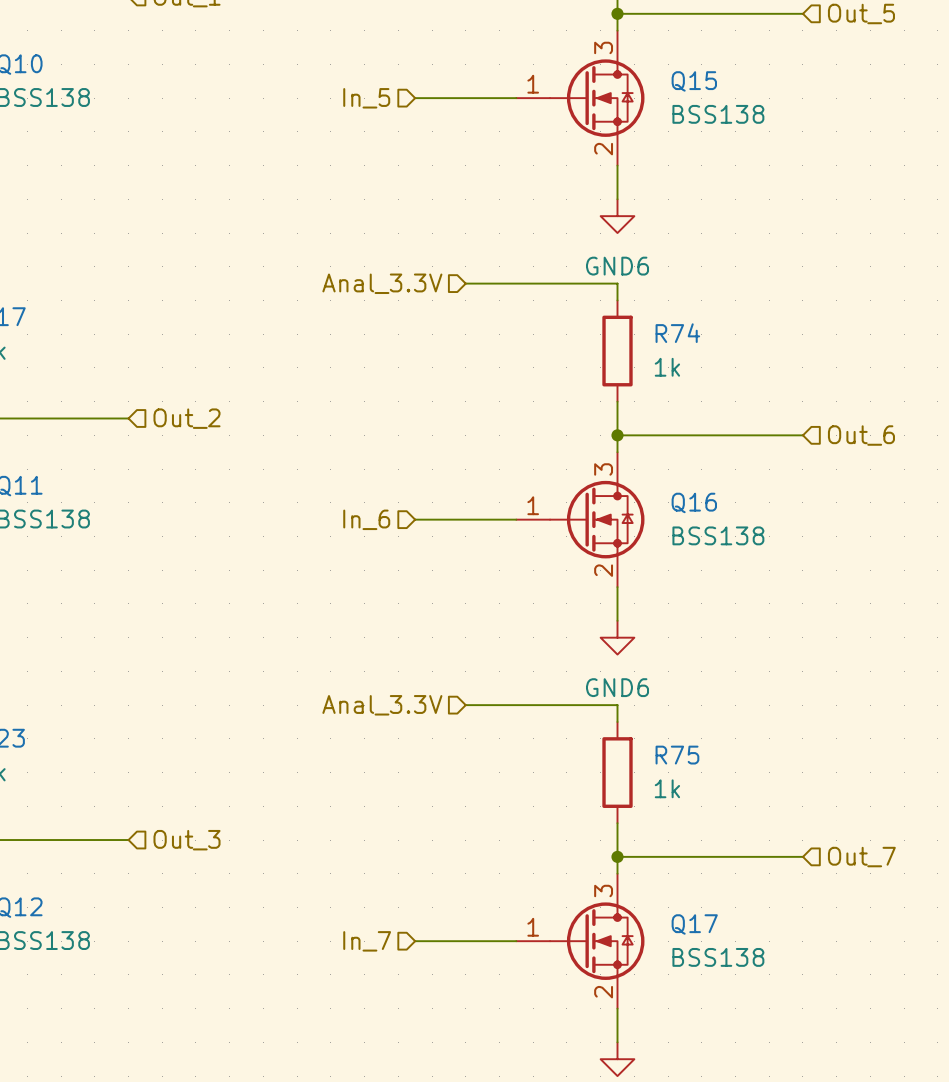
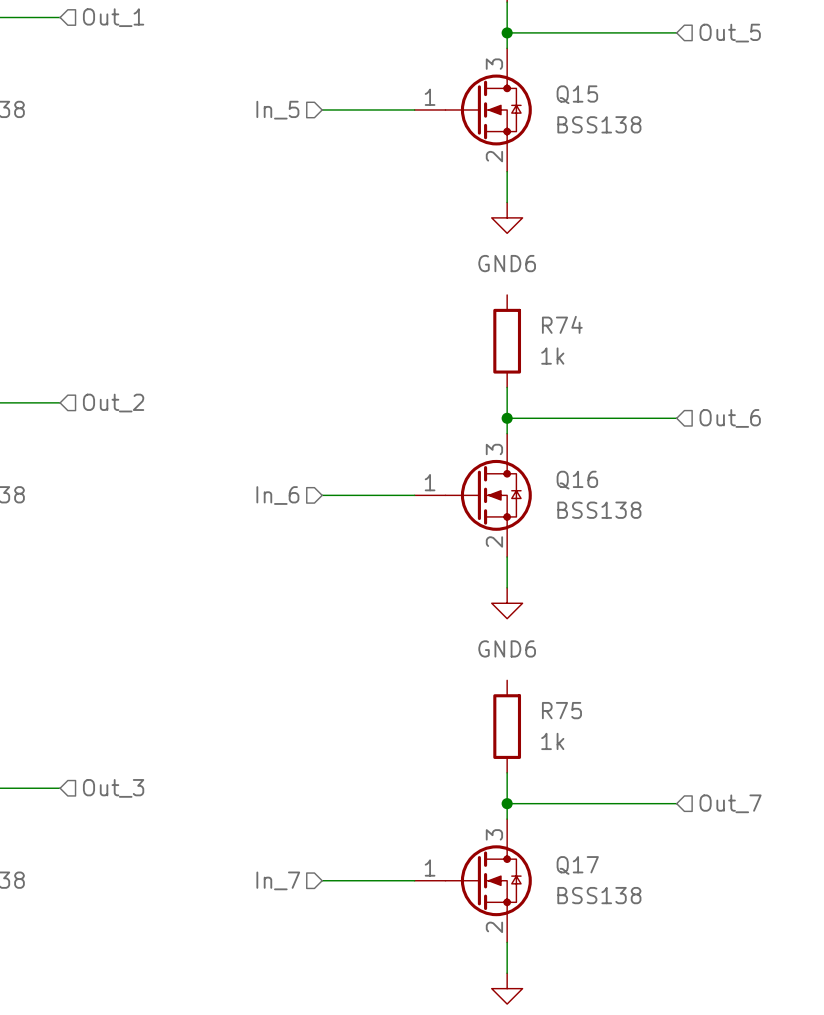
hierarchical label: Anal_3.3V (382, 283) -> none
wire: (465, 283) (617, 283) (617, 300) -> none
hierarchical label: Anal_3.3V (382, 705) -> none
wire: (465, 705) (617, 705) (617, 721) -> none

